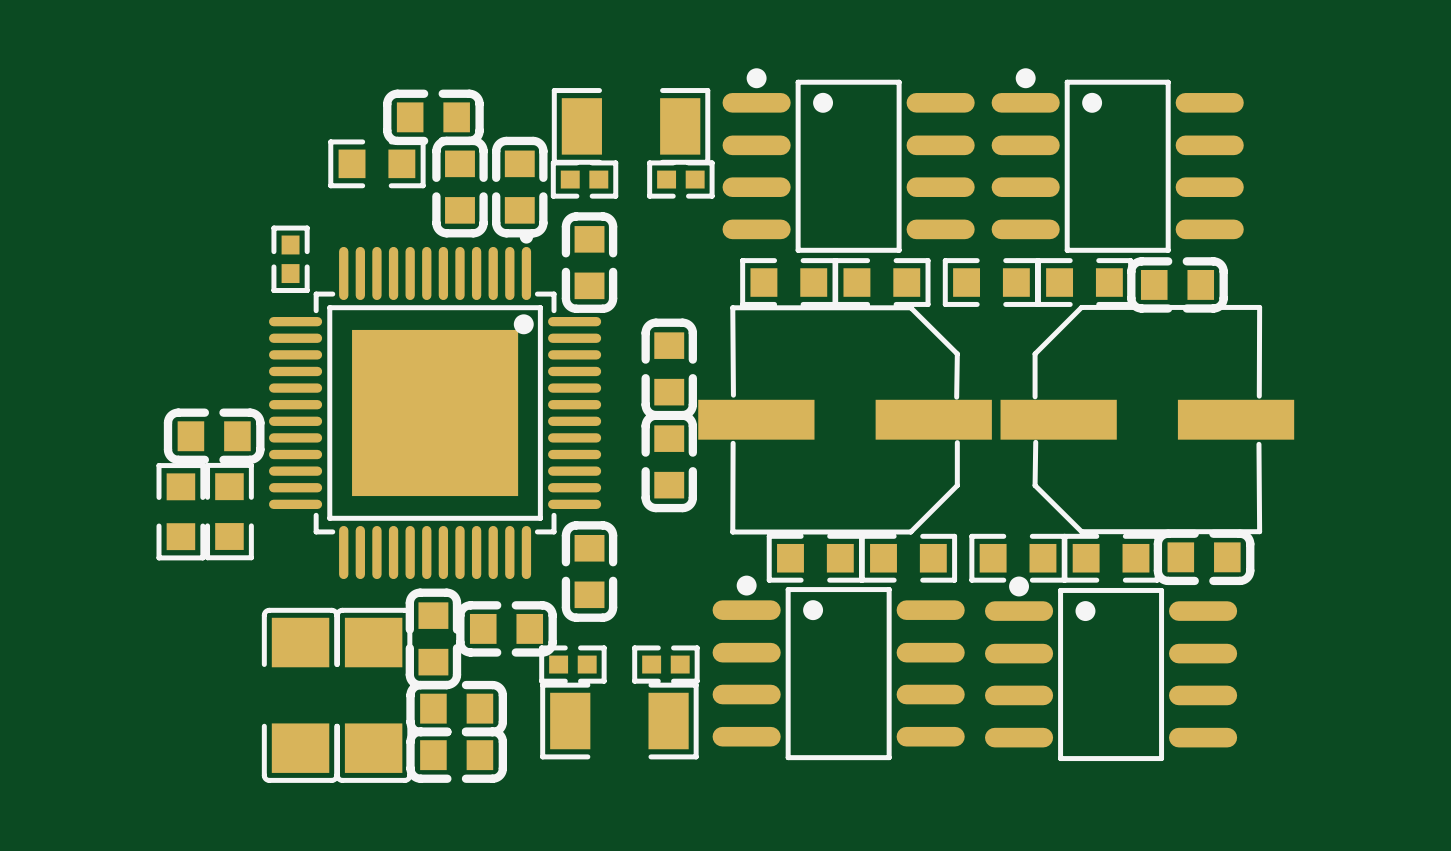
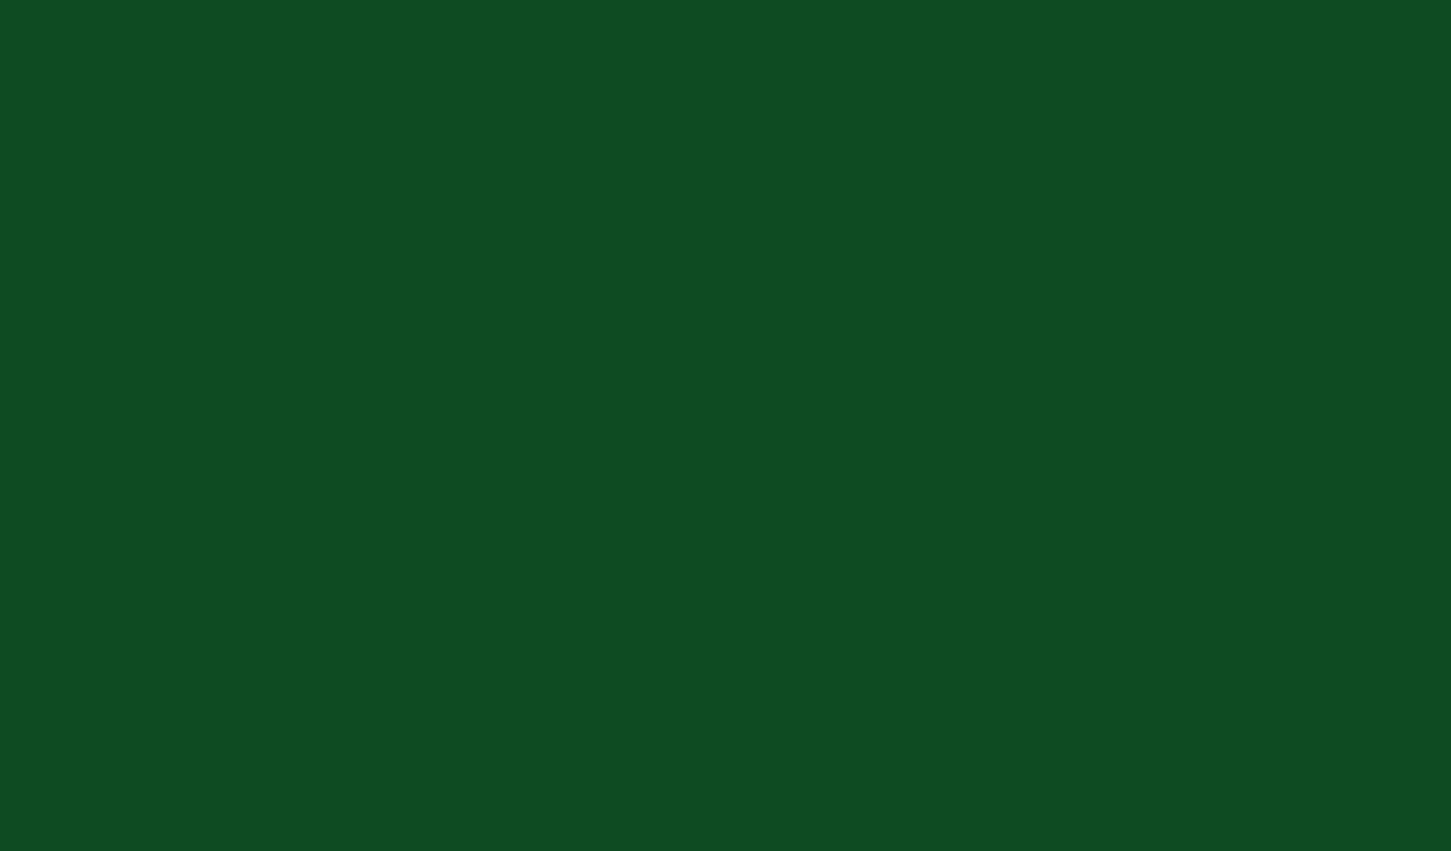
part: (433, 117) -> none
part: (631, 126) -> none
part: (848, 160) -> none
part: (1117, 160) -> none
part: (376, 163) -> none
part: (584, 179) -> none
part: (680, 179) -> none
part: (459, 187) -> none
part: (519, 187) -> none
part: (290, 259) -> none
part: (589, 262) -> none
part: (788, 282) -> none
part: (881, 282) -> none
part: (991, 282) -> none
part: (1084, 282) -> none
part: (1177, 284) -> none
part: (669, 368) -> none
part: (435, 404) -> none
part: (845, 419) -> none
part: (1147, 419) -> none
part: (214, 436) -> none
part: (669, 461) -> none
part: (180, 511) -> none
part: (229, 511) -> none
part: (1204, 557) -> none
part: (815, 558) -> none
part: (908, 558) -> none
part: (1018, 558) -> none
part: (1111, 558) -> none
part: (589, 571) -> none
part: (506, 628) -> none
part: (433, 638) -> none
part: (572, 664) -> none
part: (665, 664) -> none
part: (838, 667) -> none
part: (1111, 668) -> none
part: (300, 695) -> none
part: (373, 695) -> none
part: (456, 708) -> none
part: (619, 721) -> none
part: (456, 755) -> none

